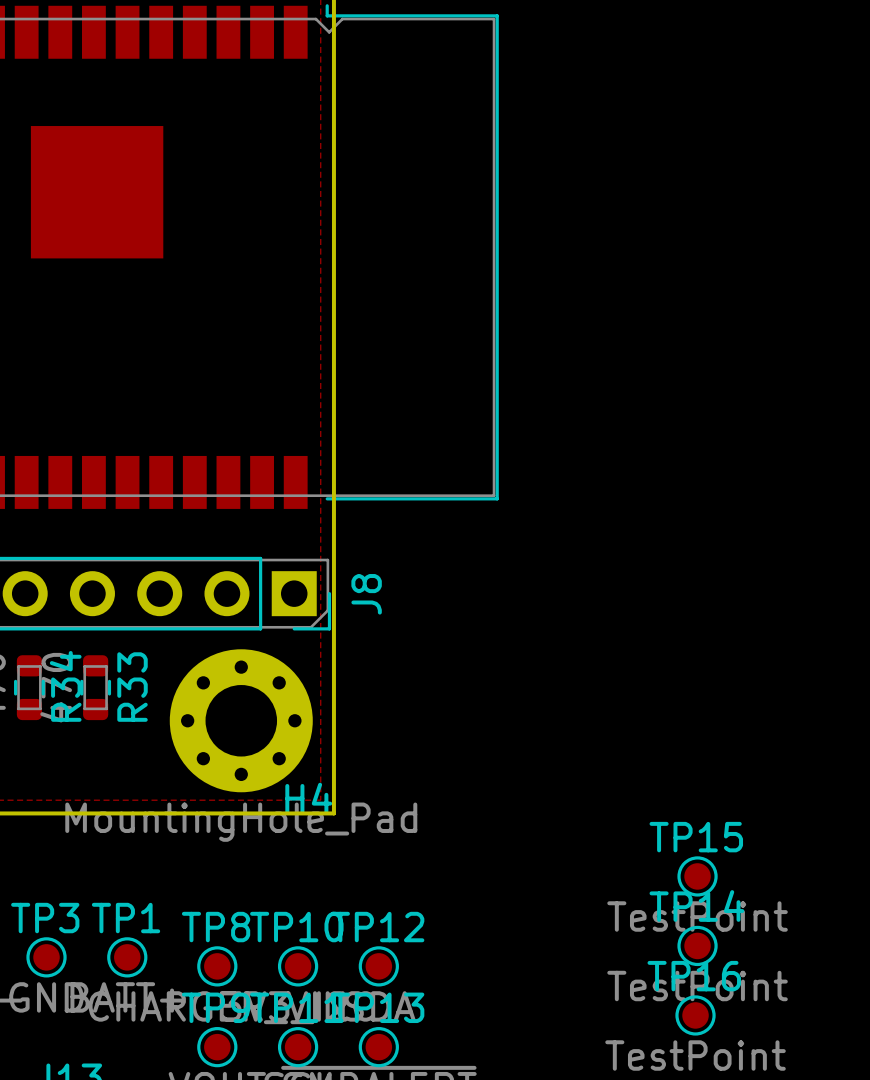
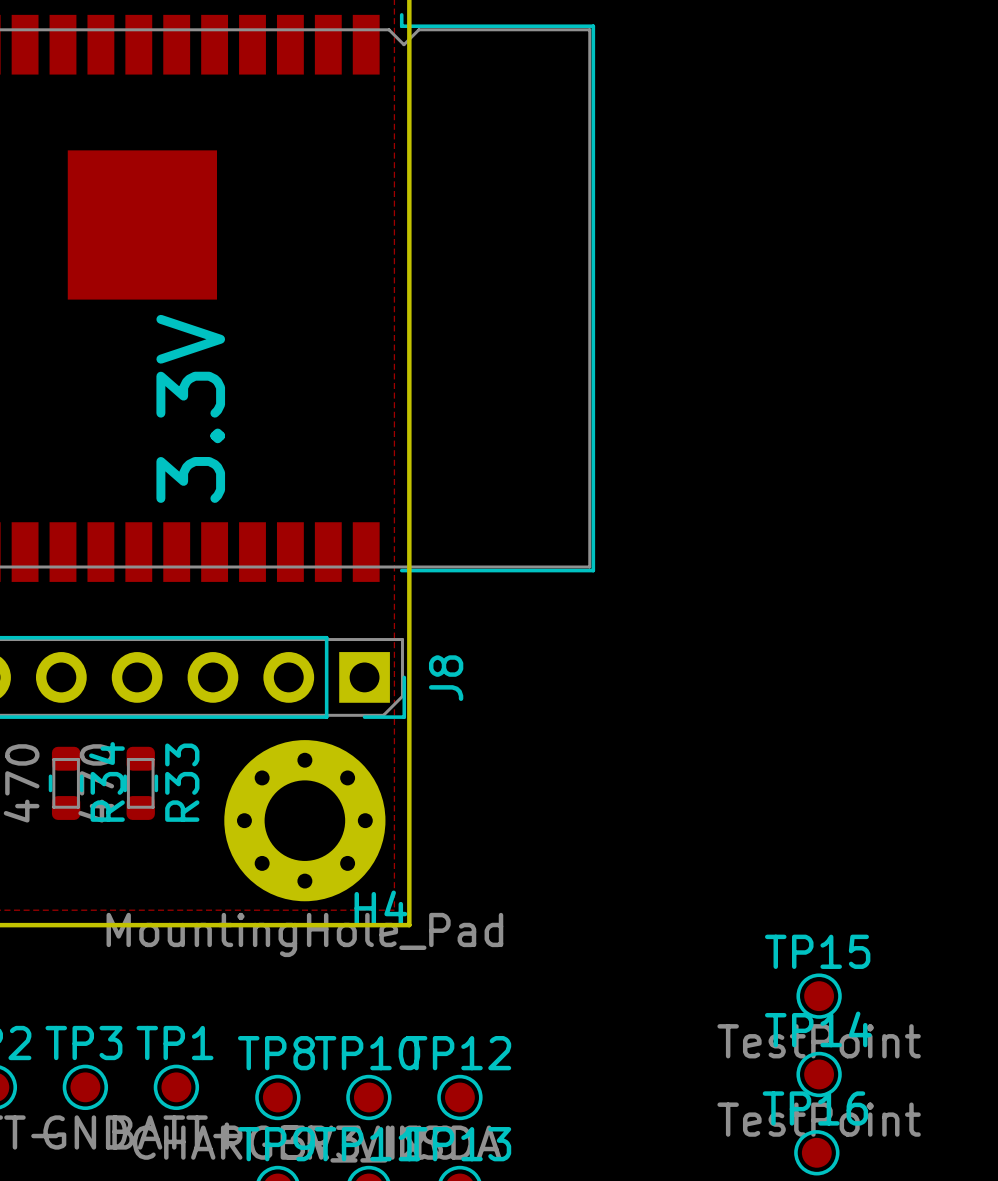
text: none -> 3.3V (190, 408)

